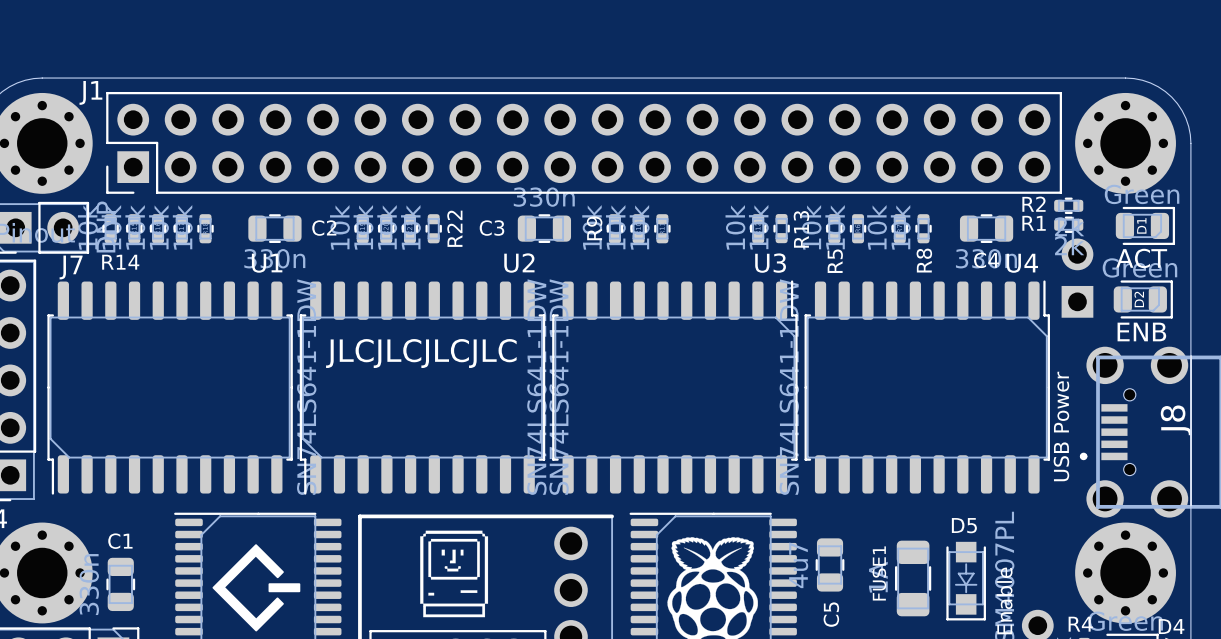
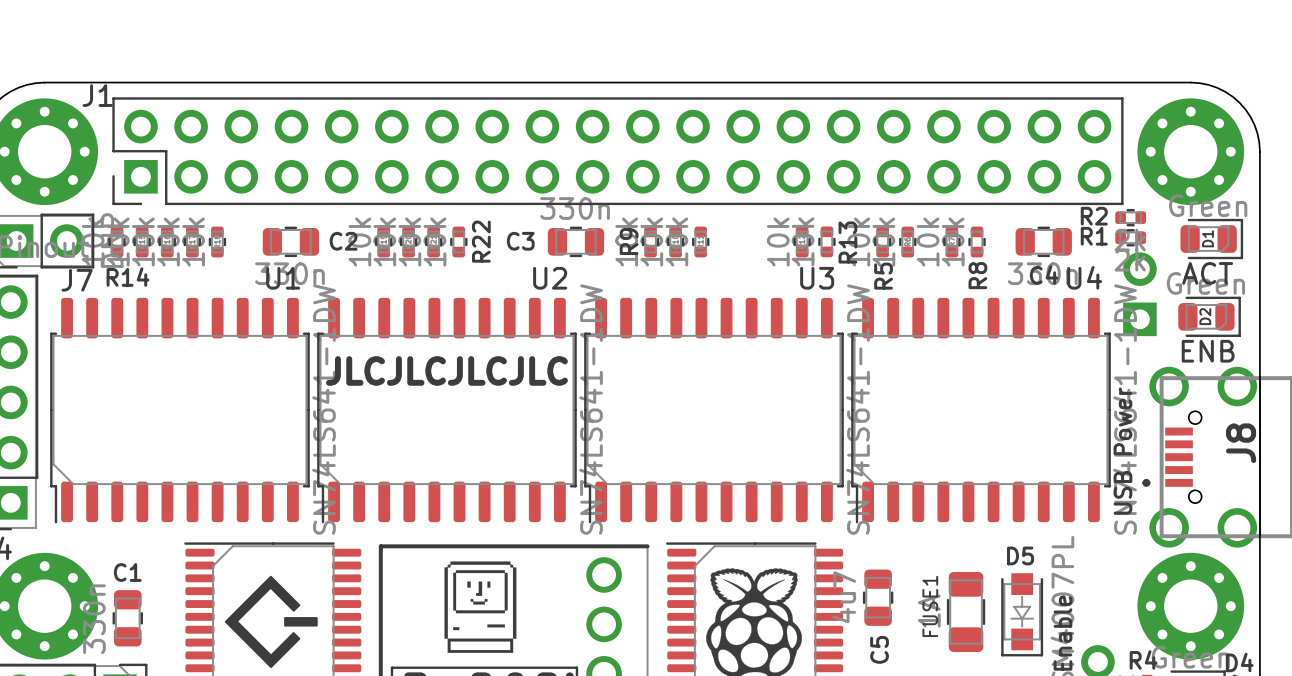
U3 rotation: 0° (674, 386) -> 180° (713, 410)
U4 rotation: 0° (927, 386) -> 180° (981, 410)

